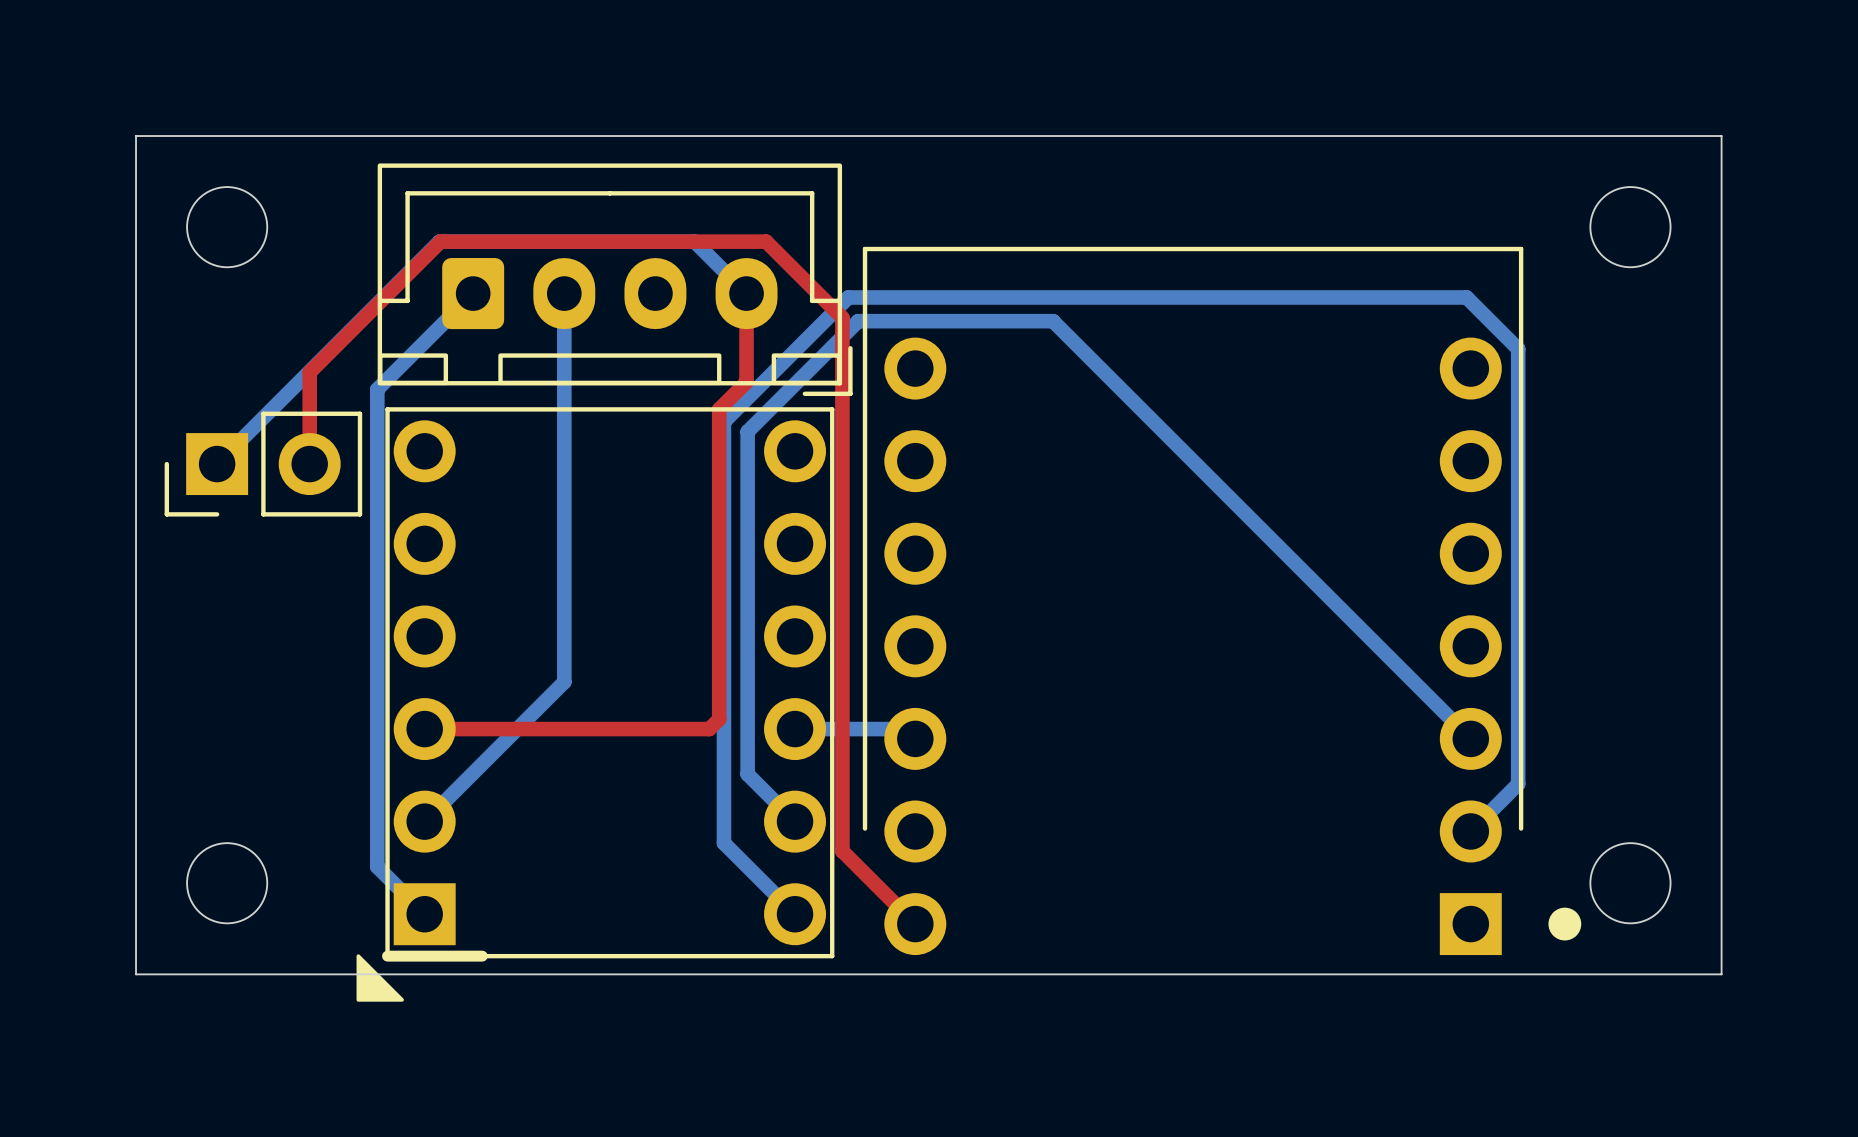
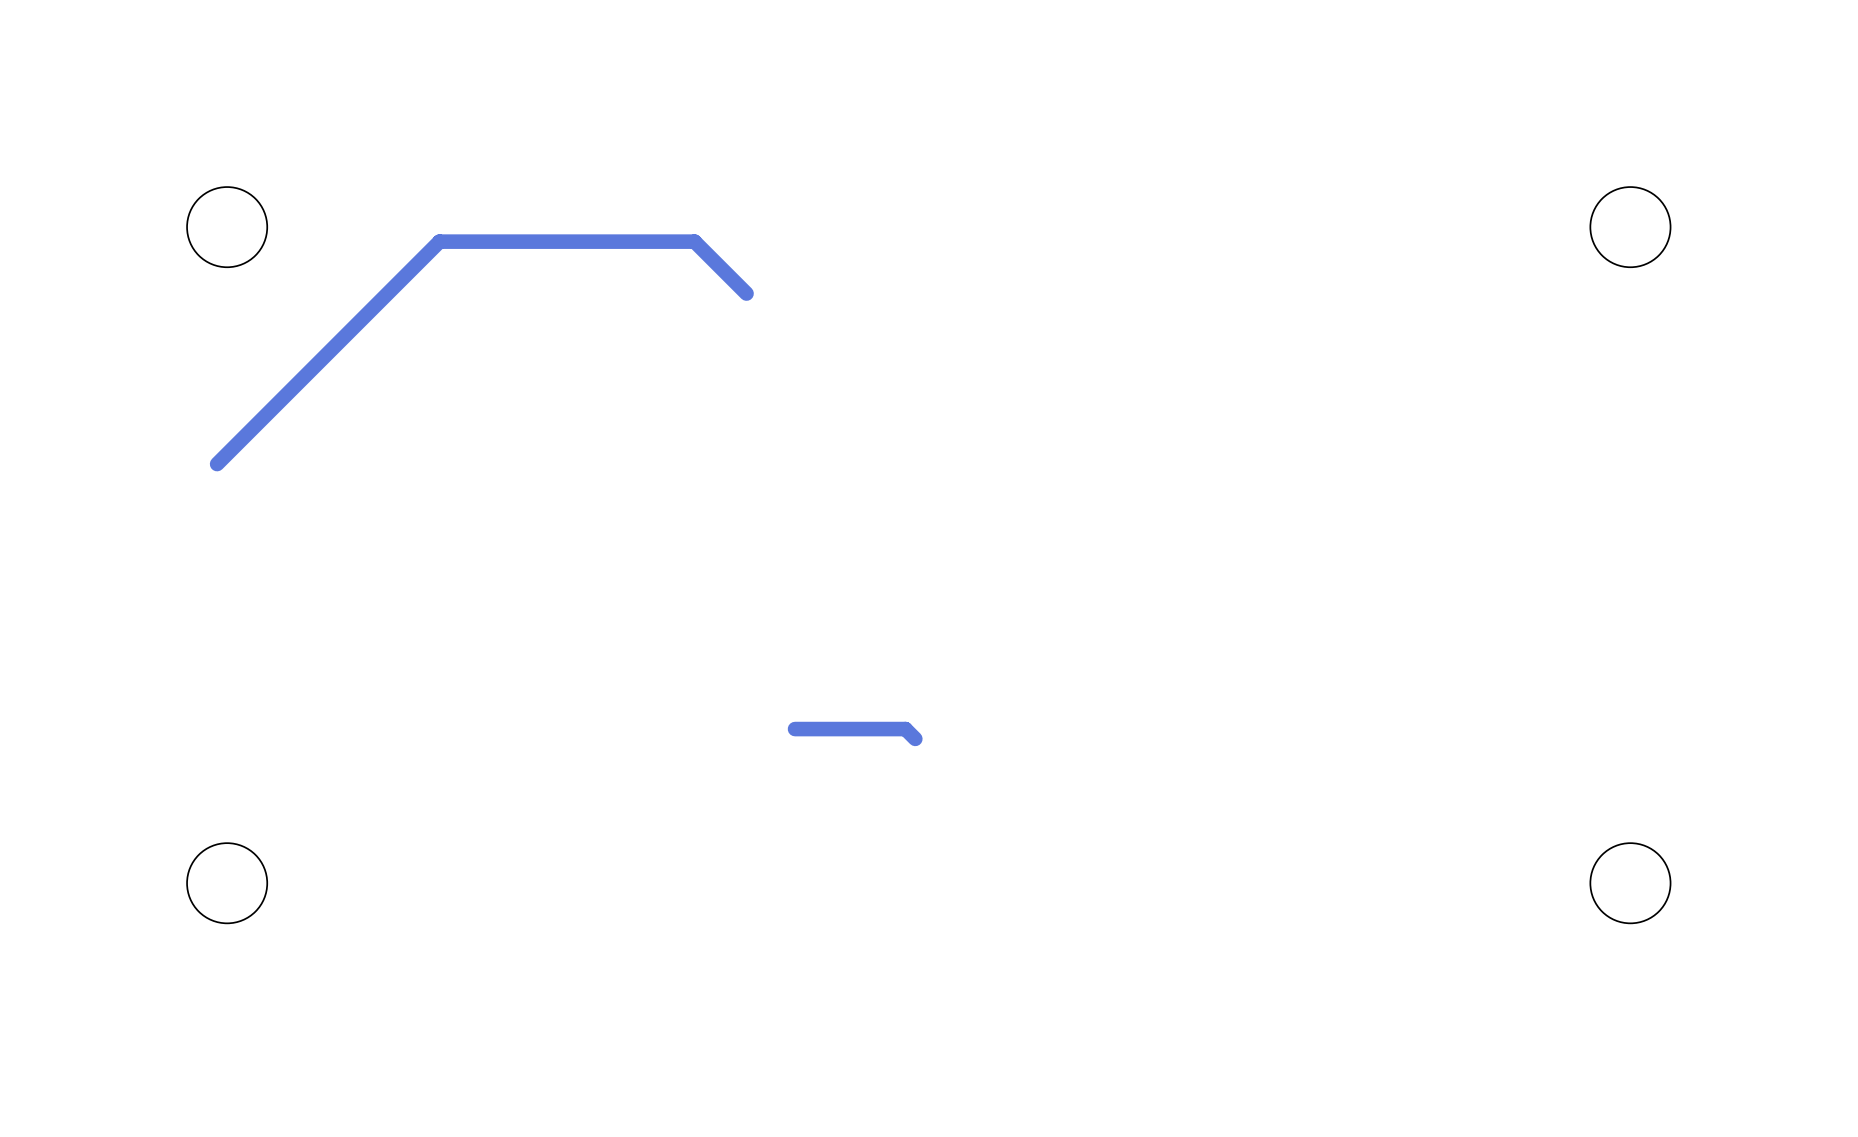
board edge: (136, 136) (1721, 136) (1721, 974) (136, 974) (136, 136) -> none
part: (615, 279) -> none
bottom track: (473, 293) (377, 389) (377, 866) (424, 914) -> none
bottom track: (564, 293) (564, 682) (424, 821) -> none
top track: (746, 293) (746, 382) (719, 409) (719, 719) (709, 729) (424, 729) -> none
part: (263, 464) -> none
top track: (309, 464) (309, 372) (440, 241) (766, 241) (842, 317) (842, 851) (915, 924) -> none
part: (1222, 600) -> none
part: (595, 704) -> none
bottom track: (1470, 738) (1053, 321) (858, 321) (747, 431) (747, 774) (795, 821) -> none
bottom track: (1470, 831) (1518, 784) (1518, 348) (1466, 297) (848, 297) (723, 421) (723, 843) (795, 914) -> none

